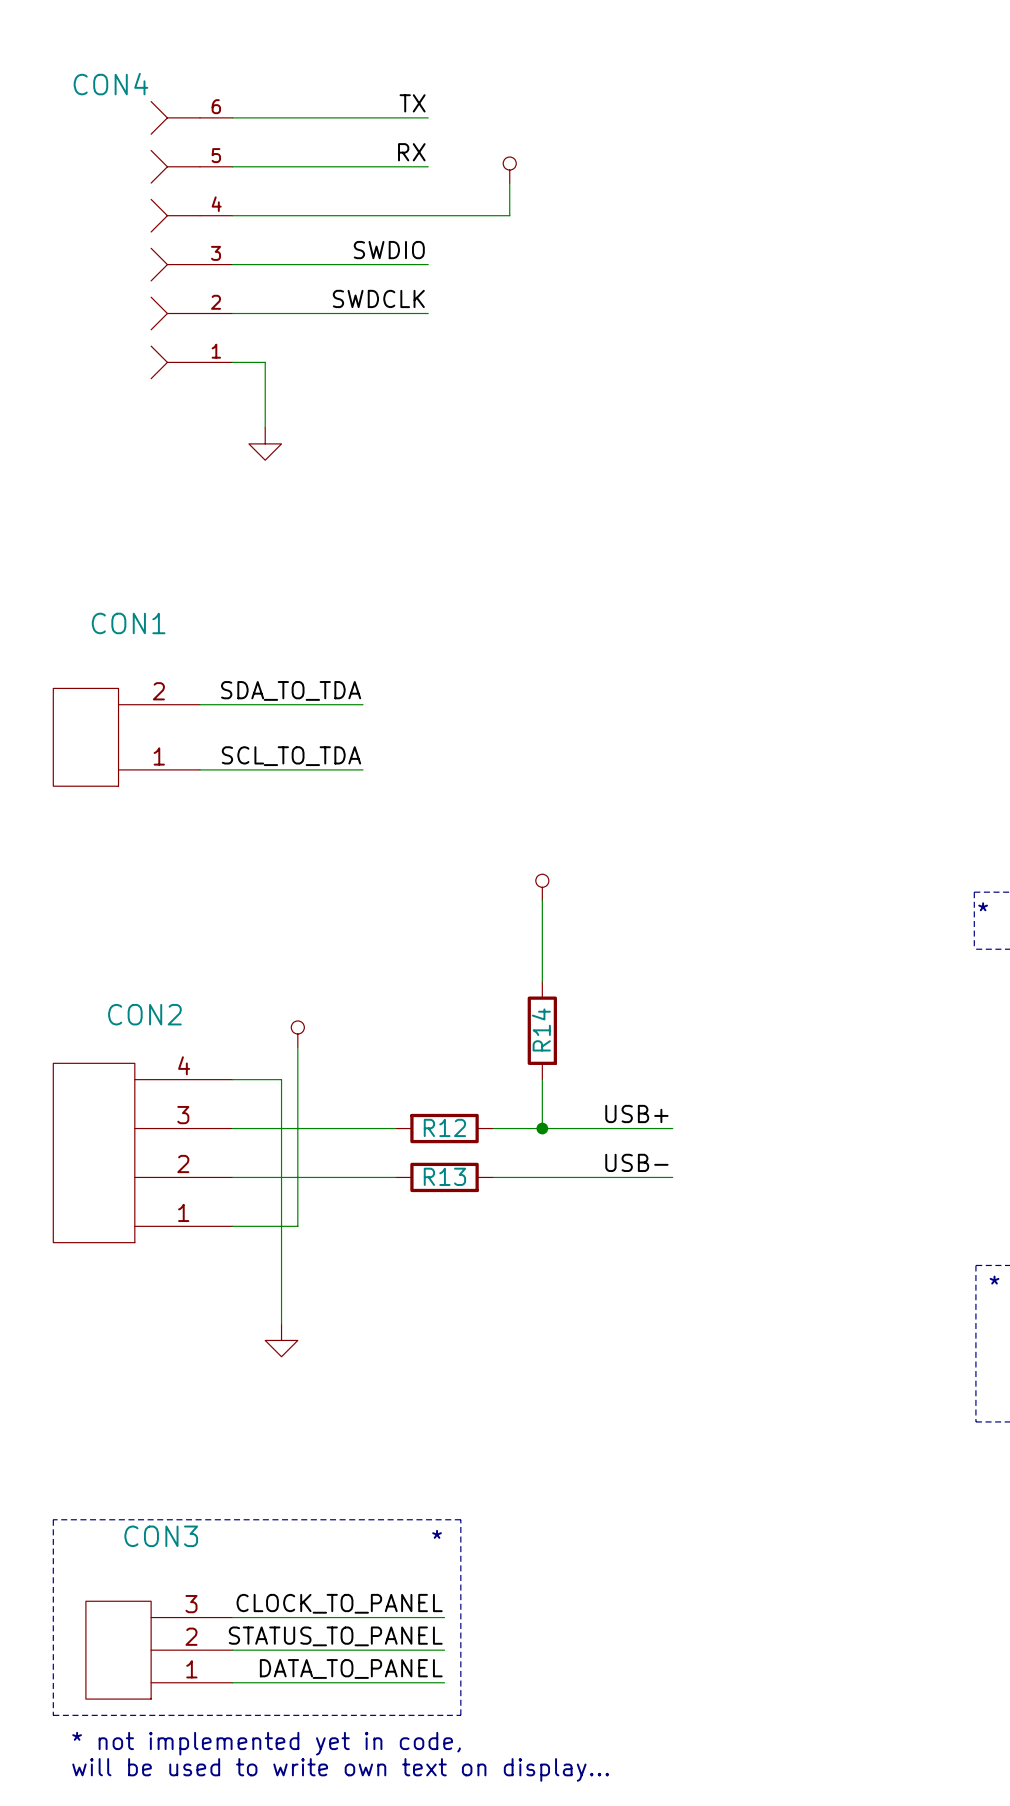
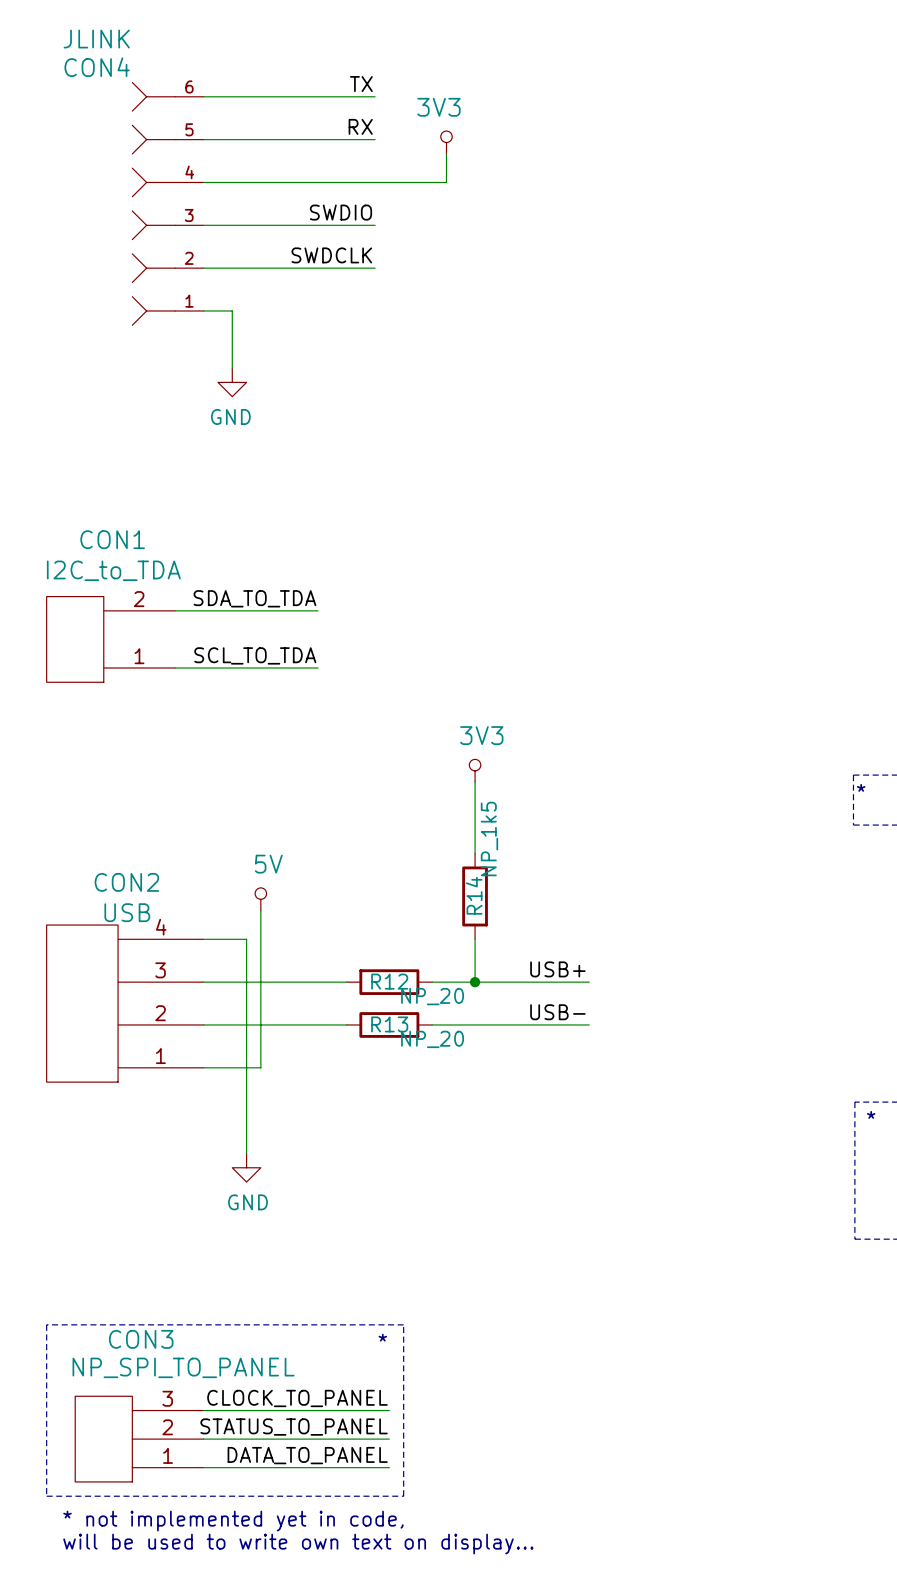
CON4 value: none -> JLINK (96, 39)
power symbol text: none -> 3V3 (438, 107)
power symbol text: none -> GND (230, 416)
CON1 value: none -> I2C_to_TDA (113, 570)
power symbol text: none -> 3V3 (481, 735)
R14 value: none -> NP_1k5 (489, 839)
power symbol text: none -> 5V (268, 864)
CON2 value: none -> USB (127, 912)
R12 value: none -> NP_20 (432, 996)
R13 value: none -> NP_20 (432, 1039)
power symbol text: none -> GND (248, 1202)
CON3 value: none -> NP_SPI_TO_PANEL (183, 1367)

